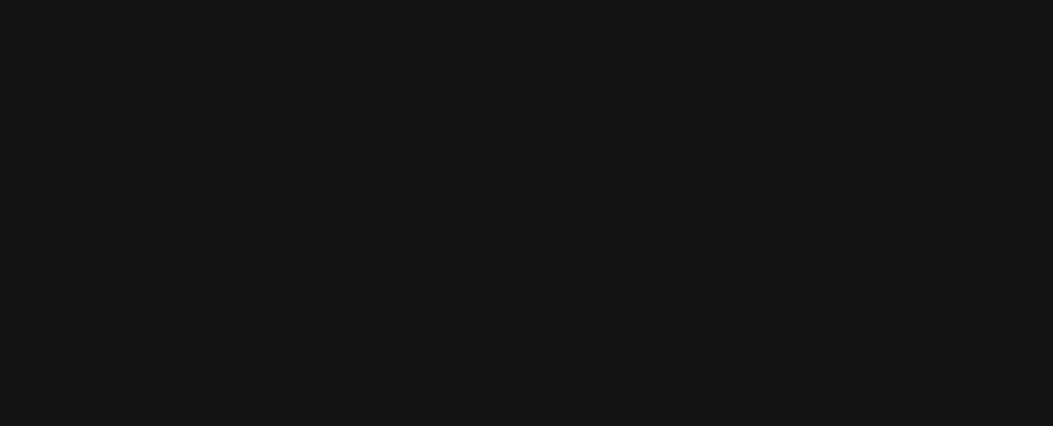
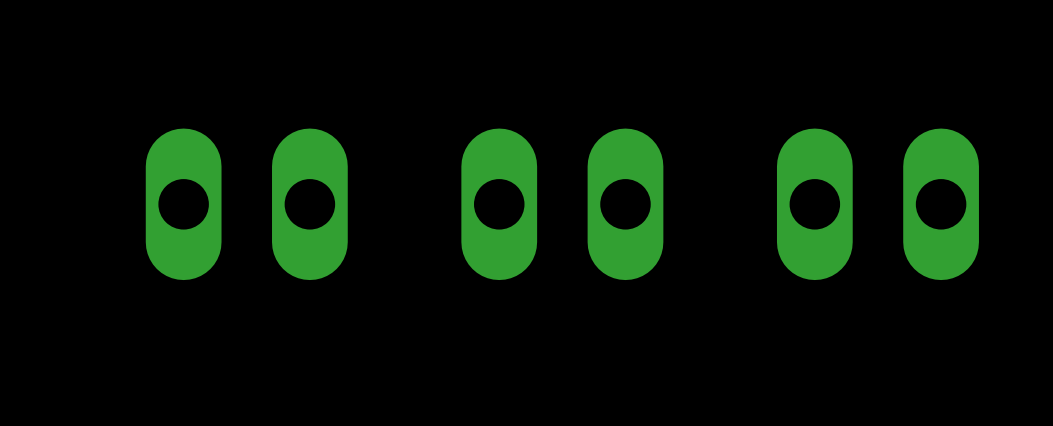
part: none -> (246, 204)
part: none -> (562, 204)
part: none -> (877, 204)

